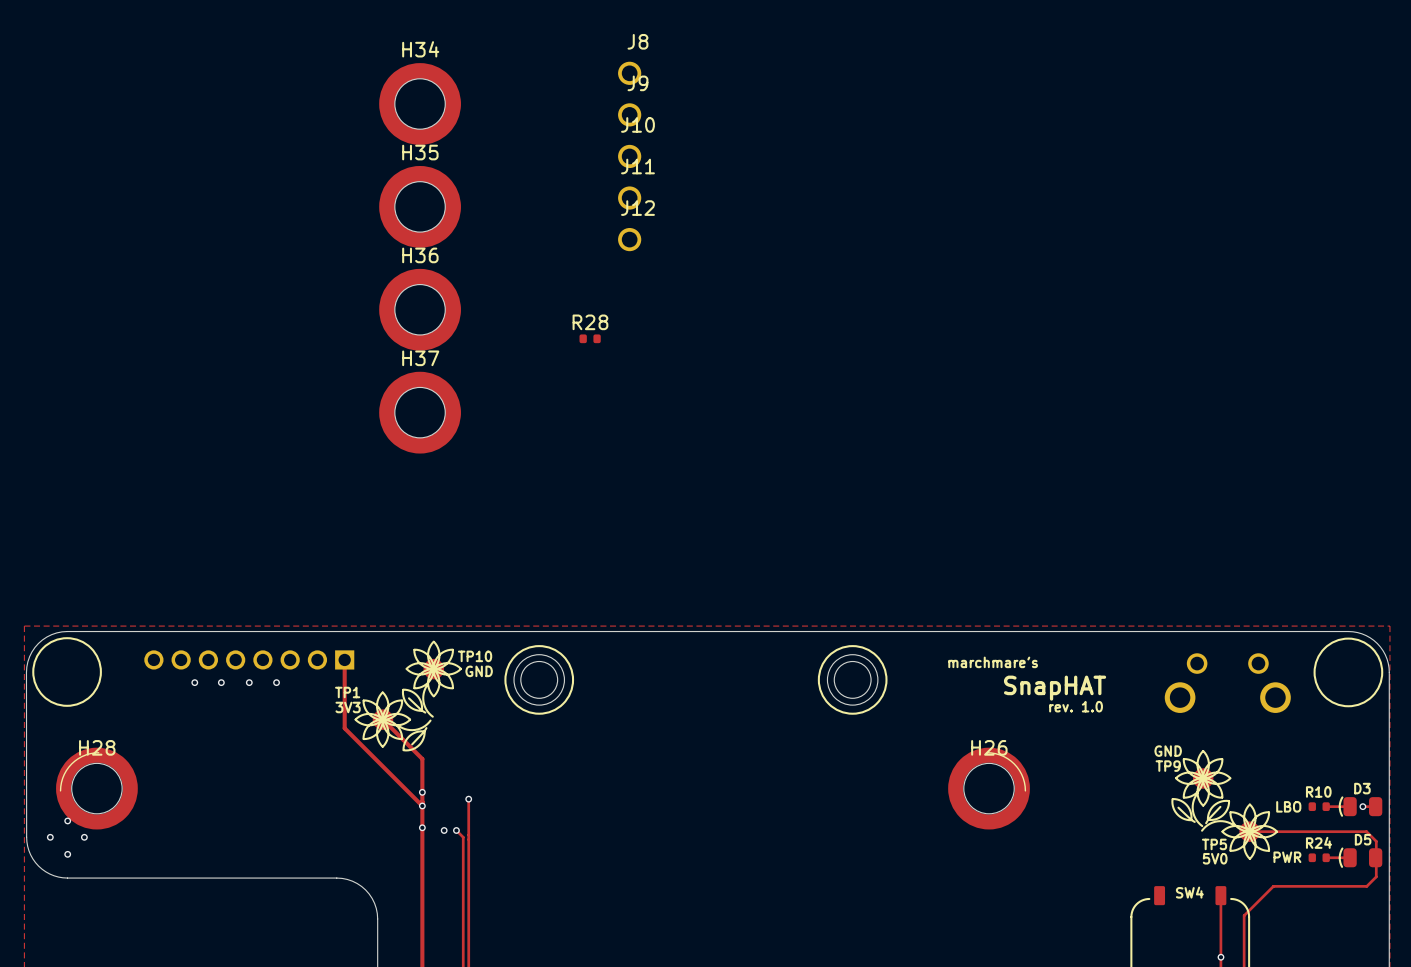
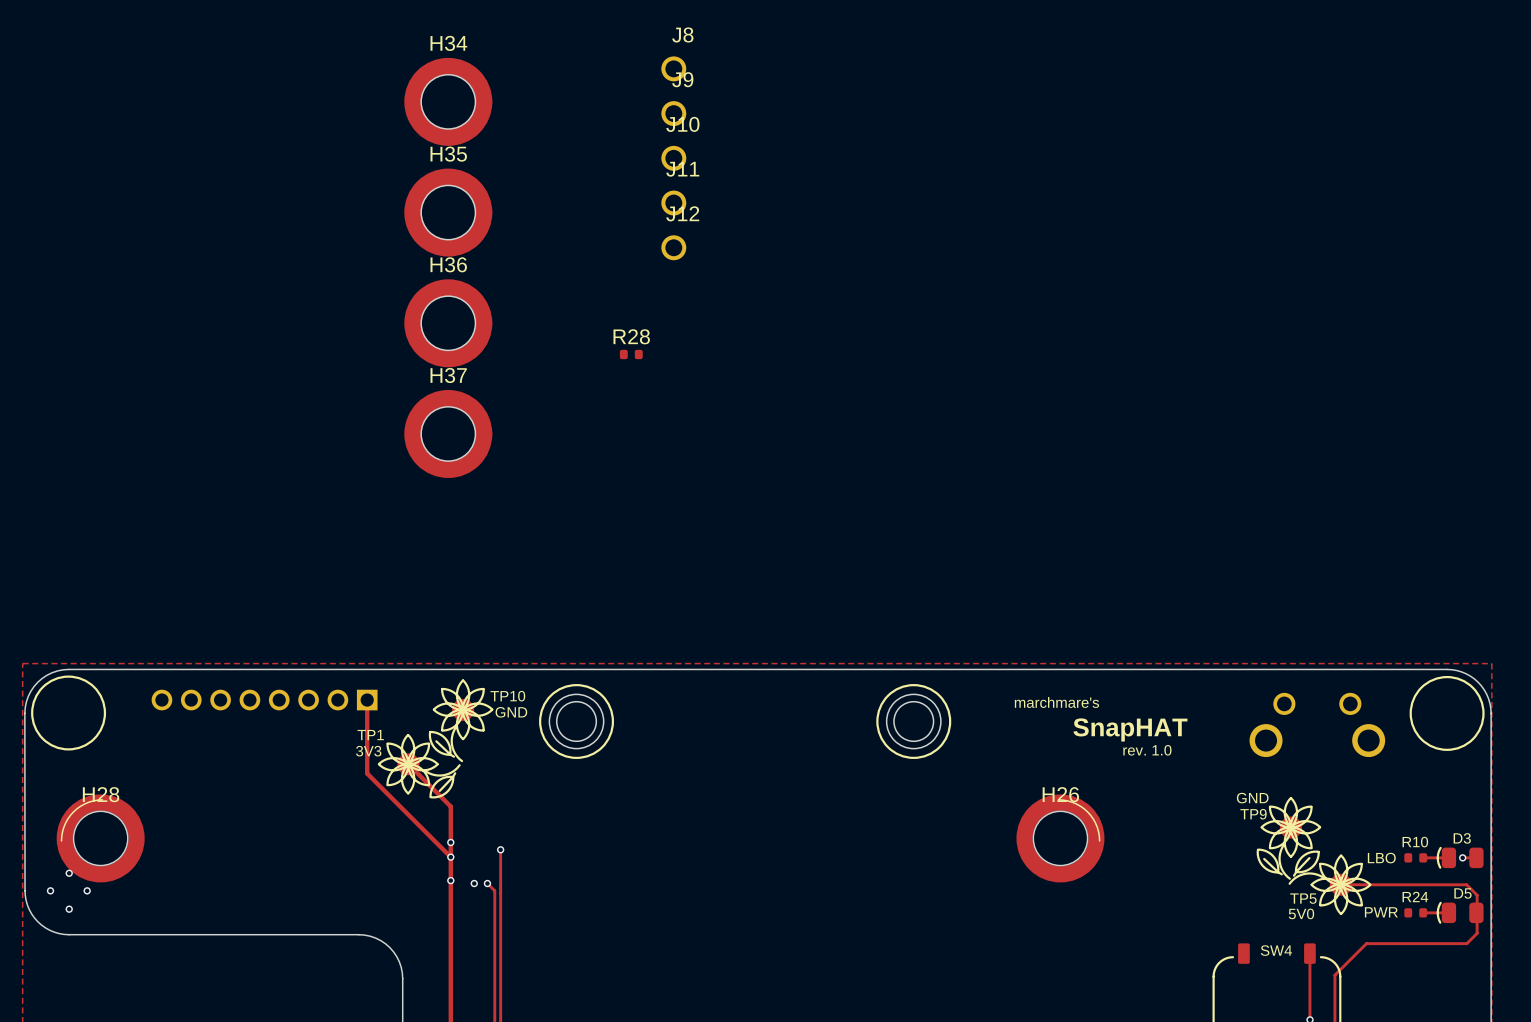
via: (194, 682) -> none
via: (221, 682) -> none
via: (249, 682) -> none
via: (276, 682) -> none

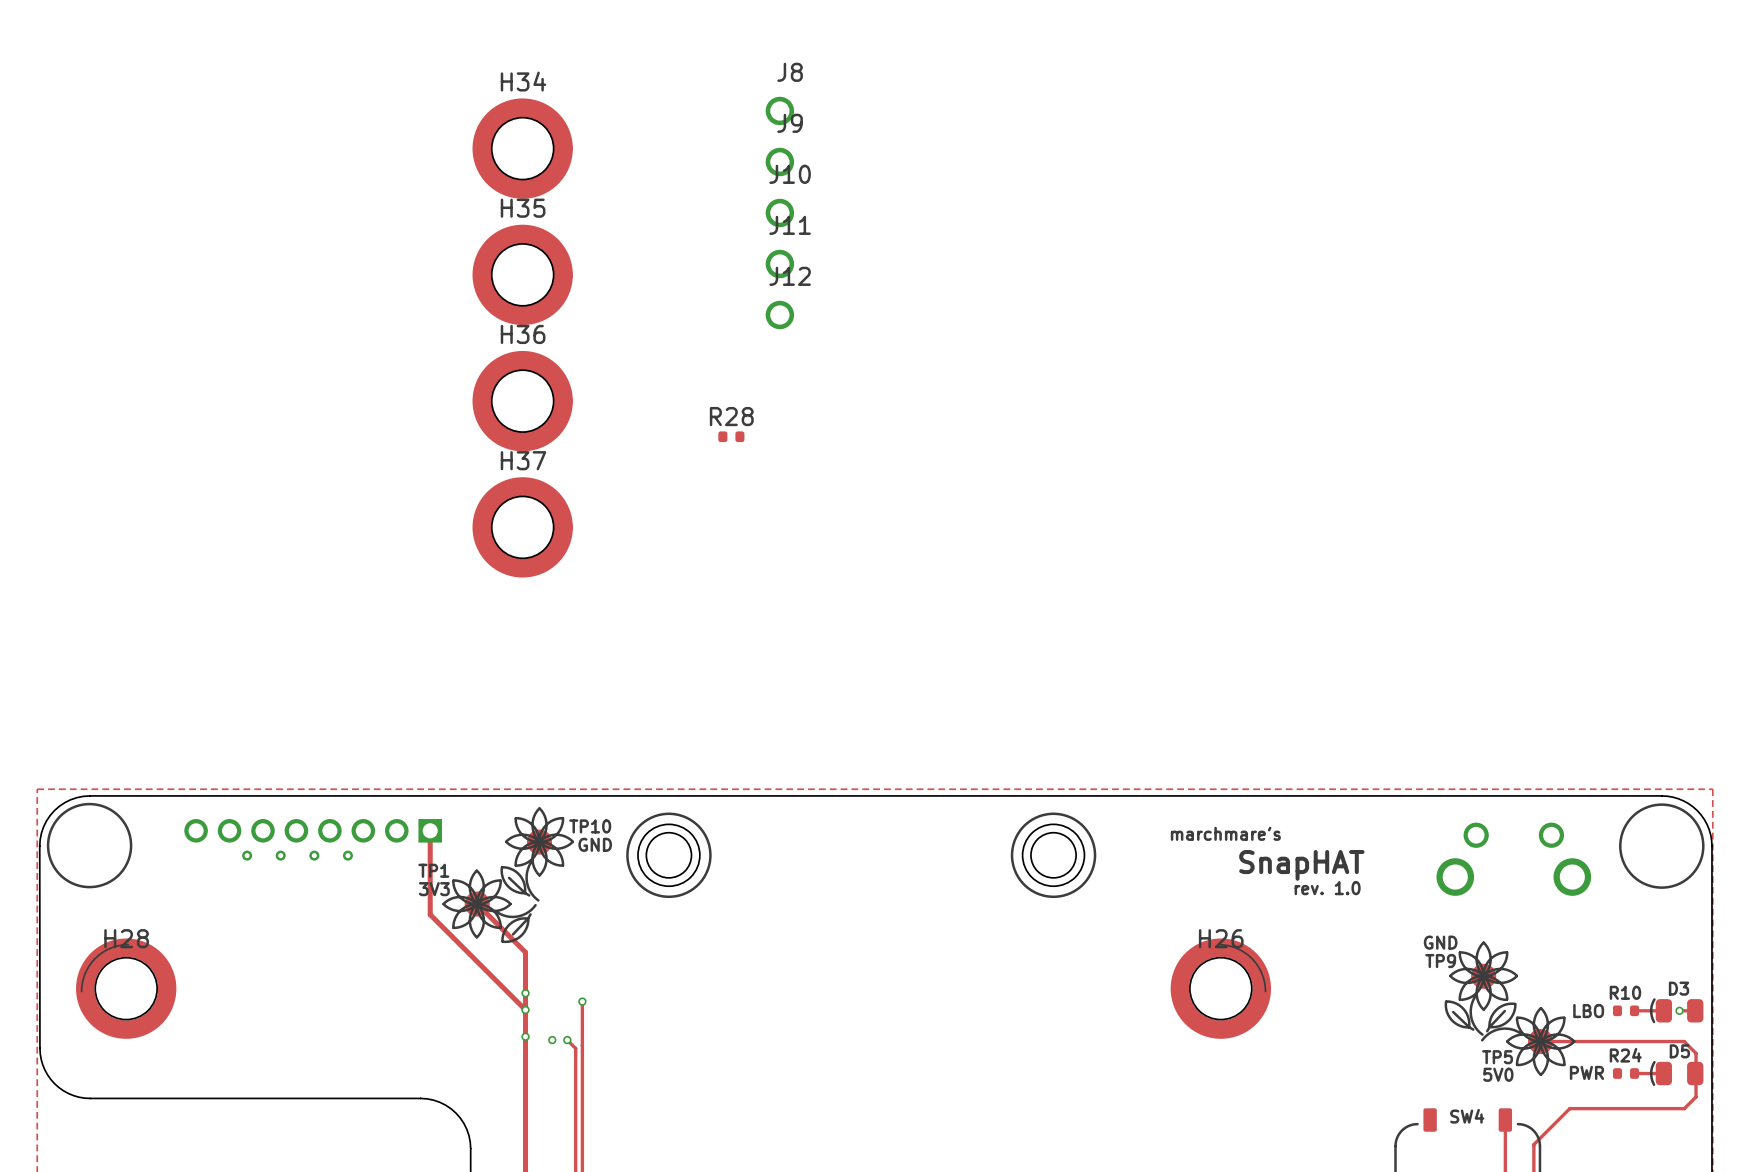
via: none -> (247, 855)
via: none -> (280, 855)
via: none -> (314, 855)
via: none -> (347, 855)
via: (69, 873) -> none
via: (50, 890) -> none
via: (87, 890) -> none
via: (69, 909) -> none

